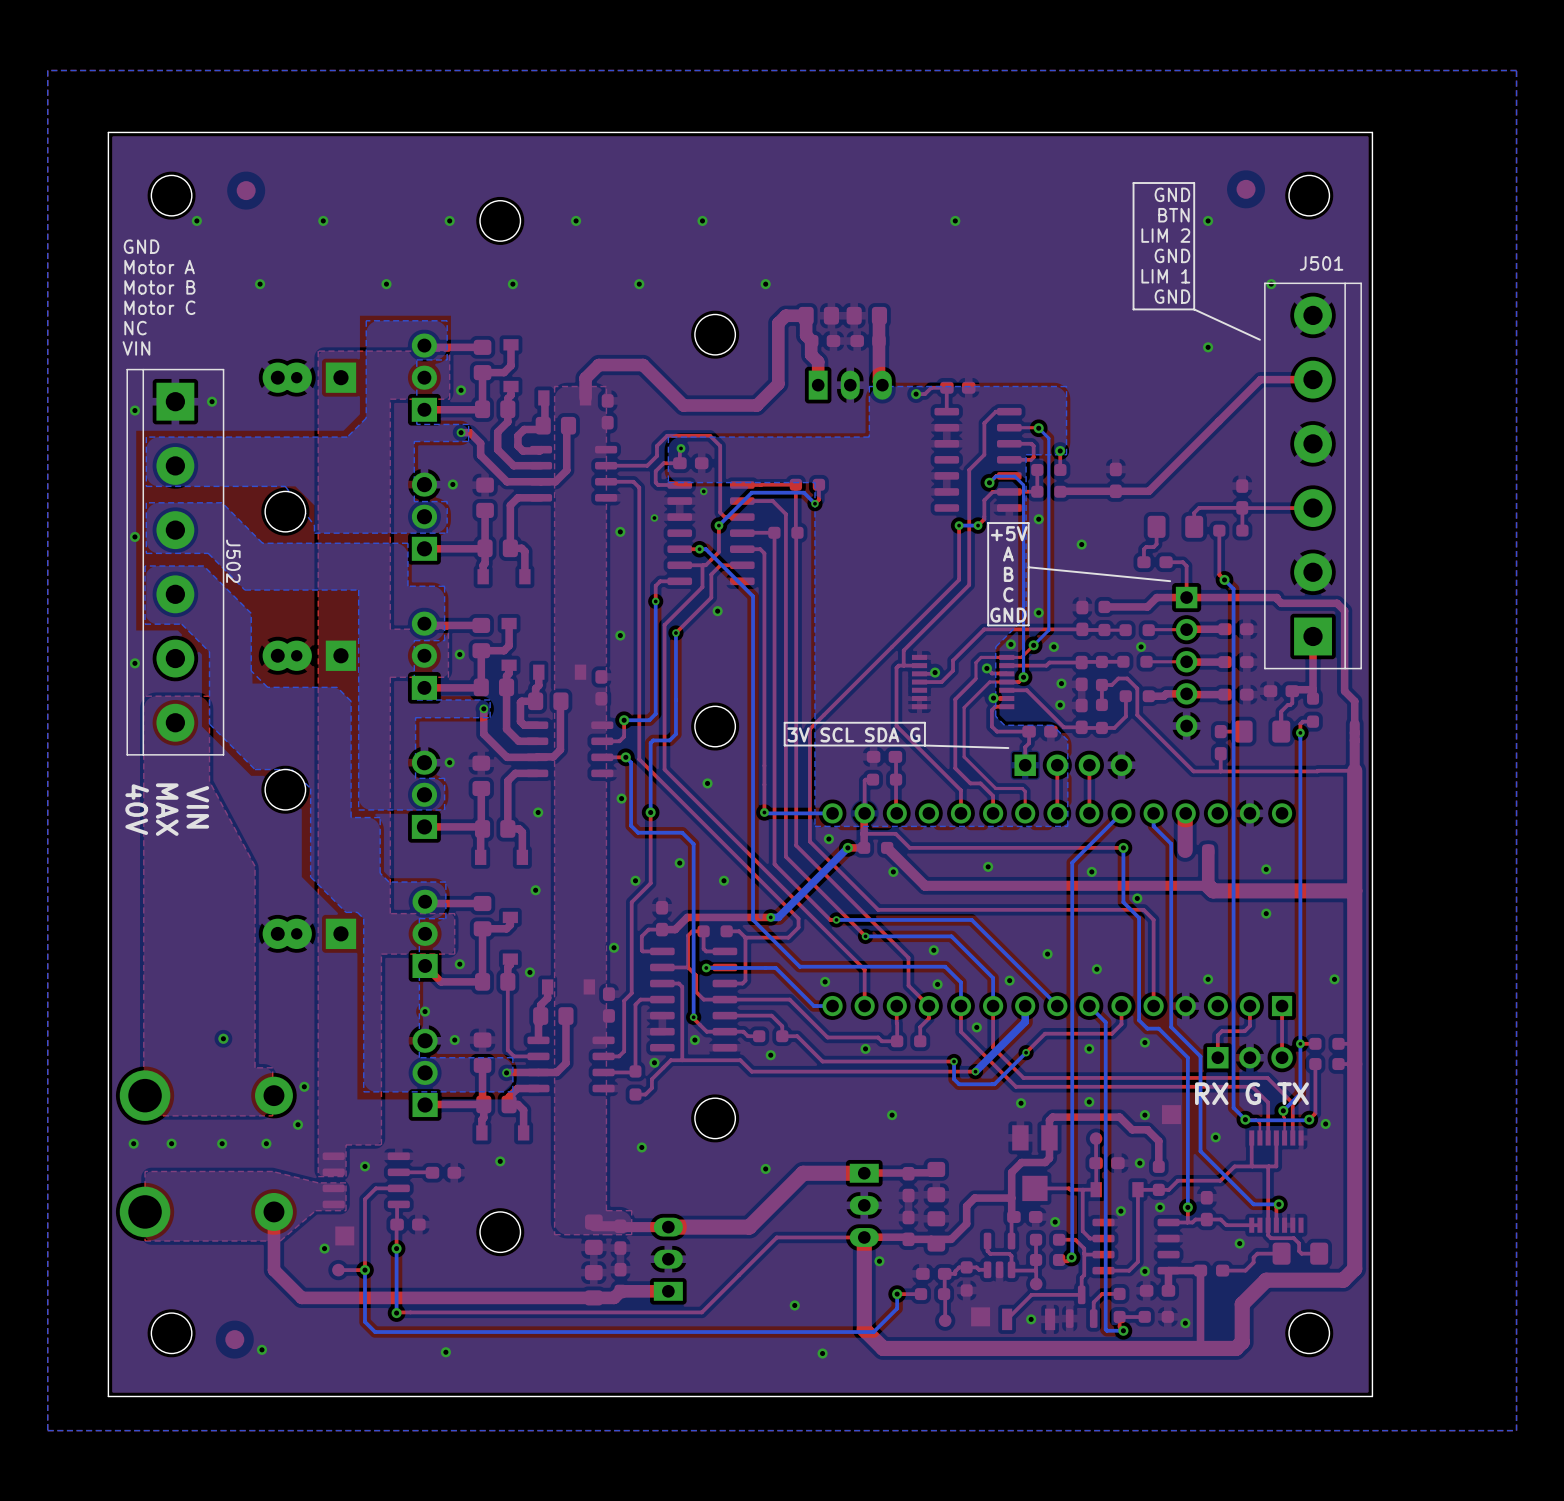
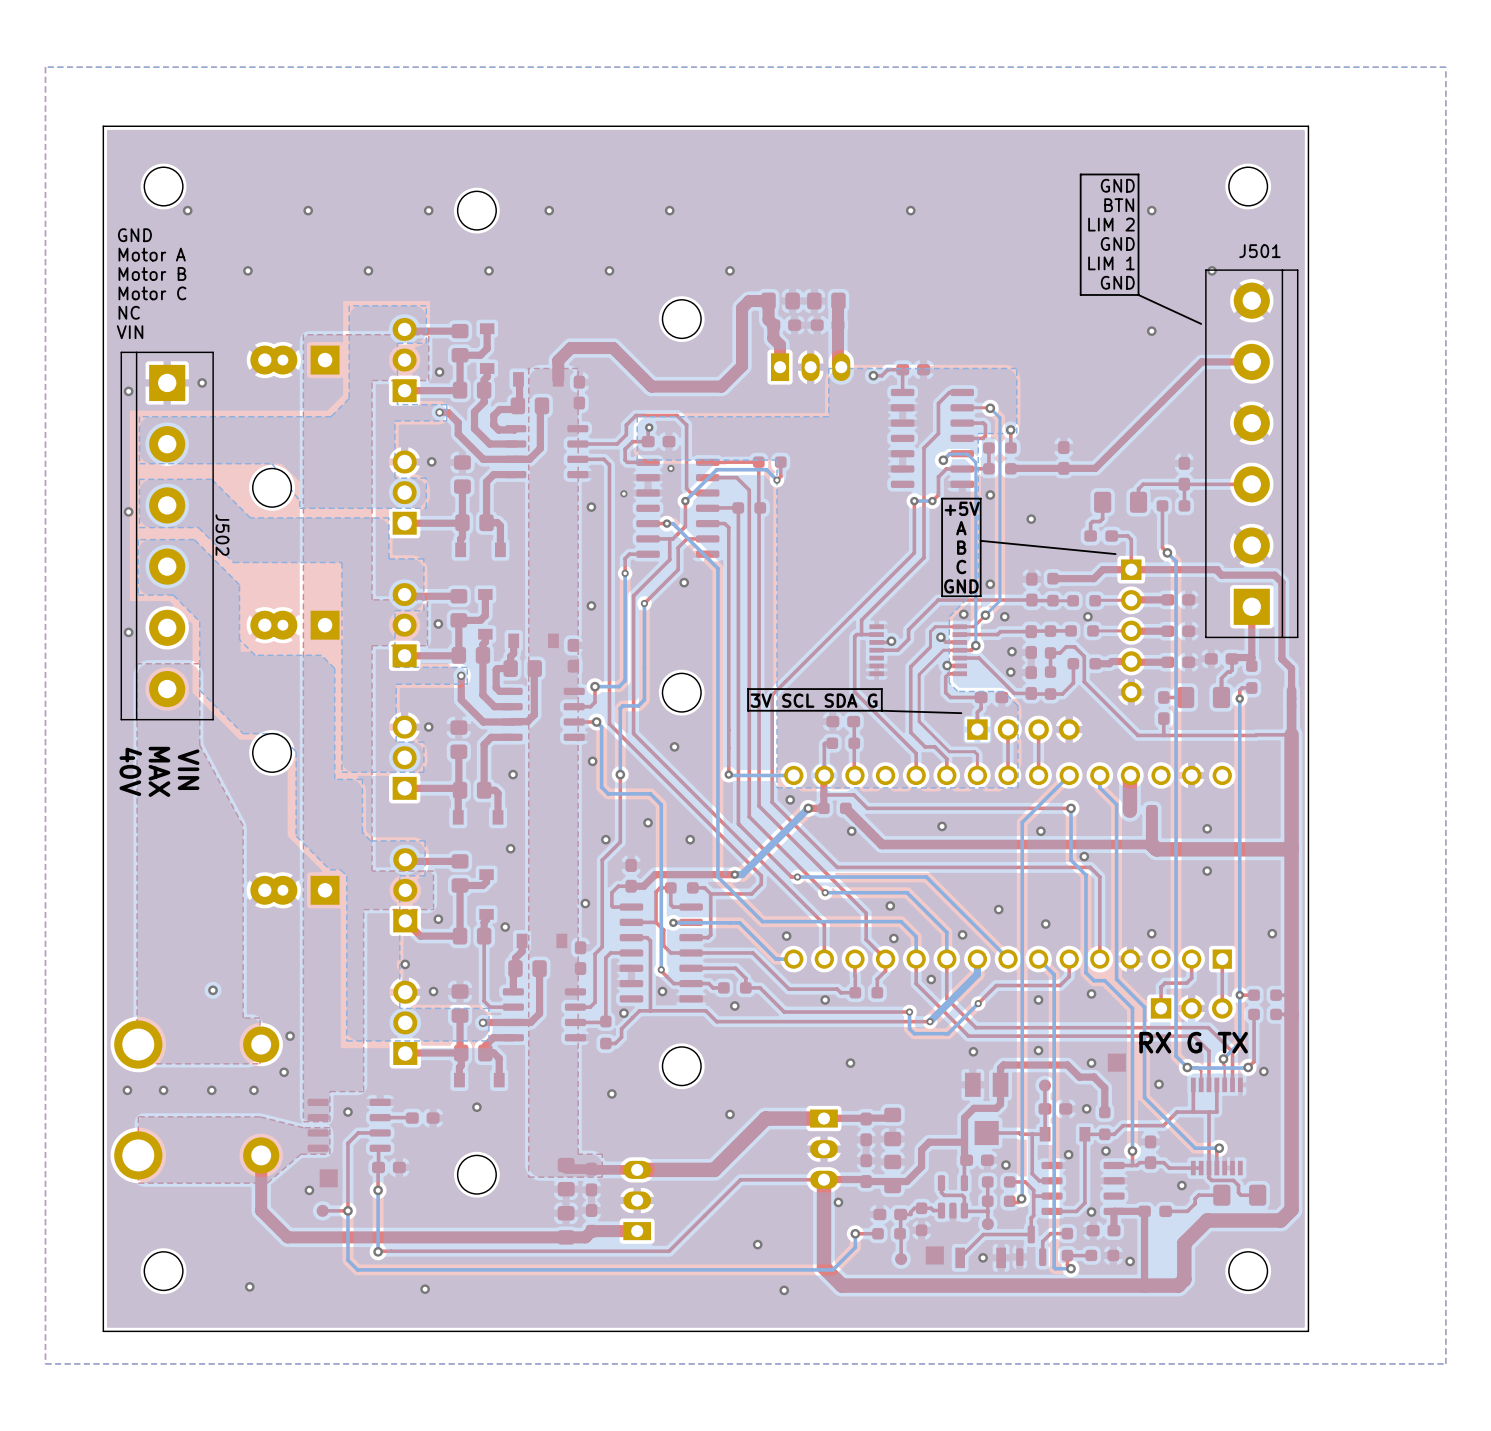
part: (1246, 189) -> none
part: (246, 190) -> none
part: (234, 1339) -> none

